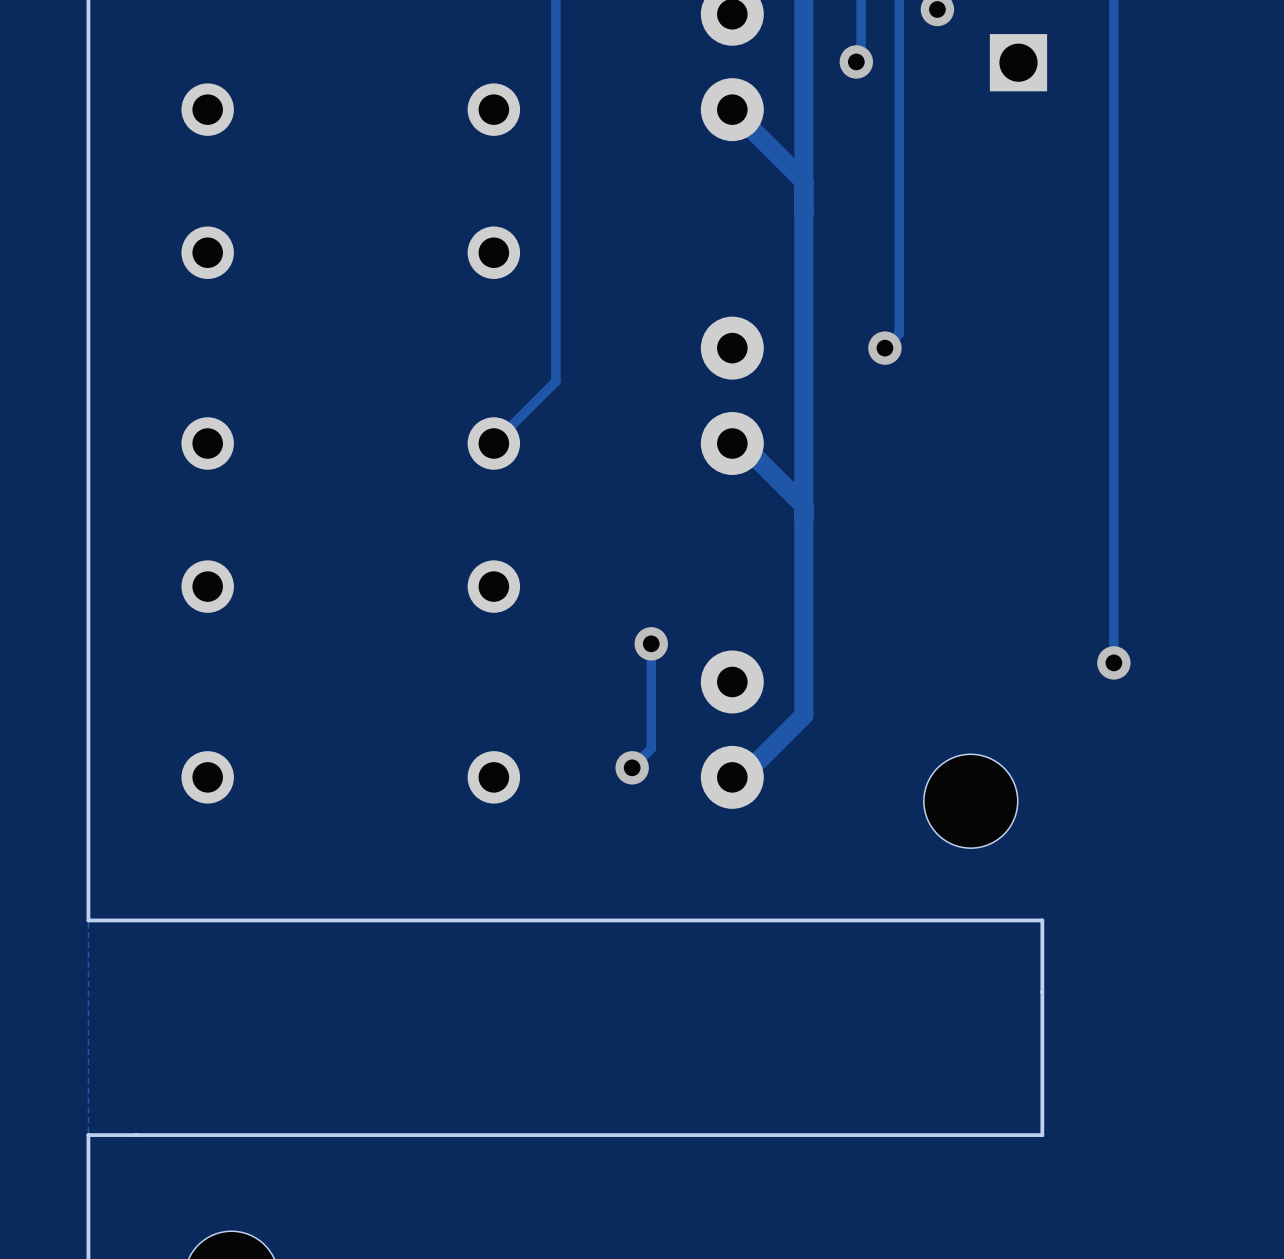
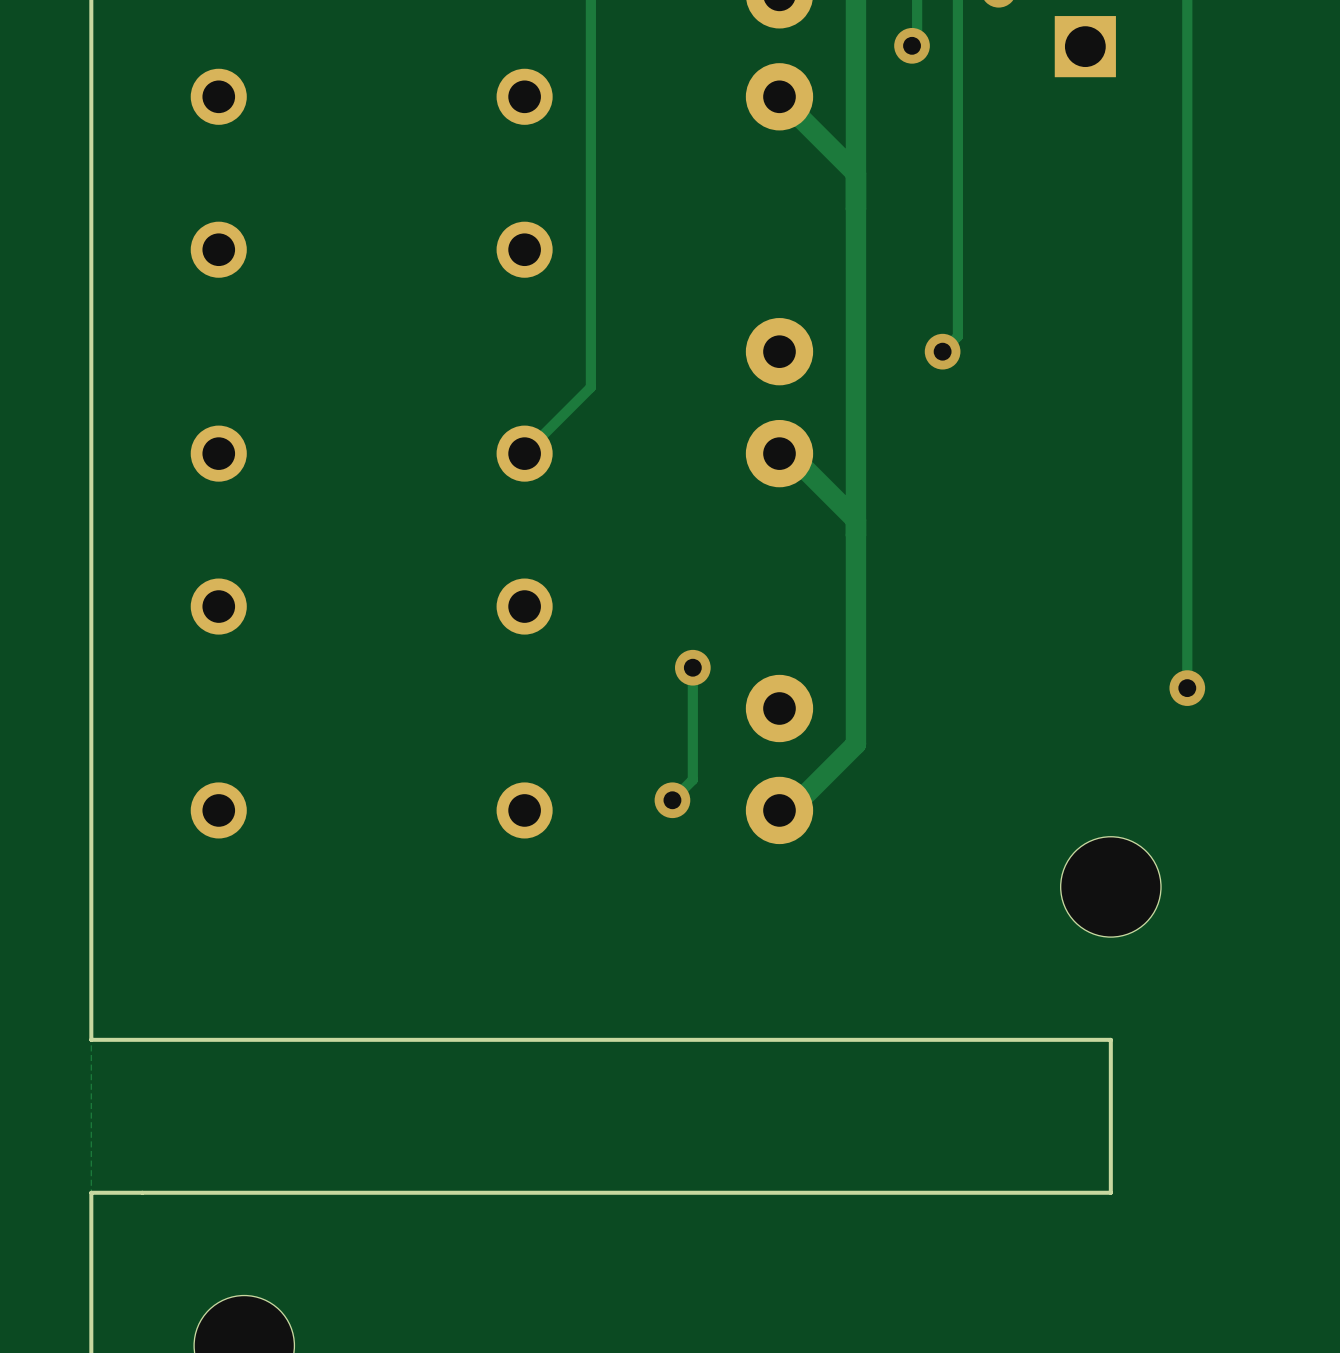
part position: (970, 801) -> (1110, 886)
board edge: (88, 920) (1042, 920) (1042, 992) -> (91, 963) (91, 1039) (1110, 1039)

